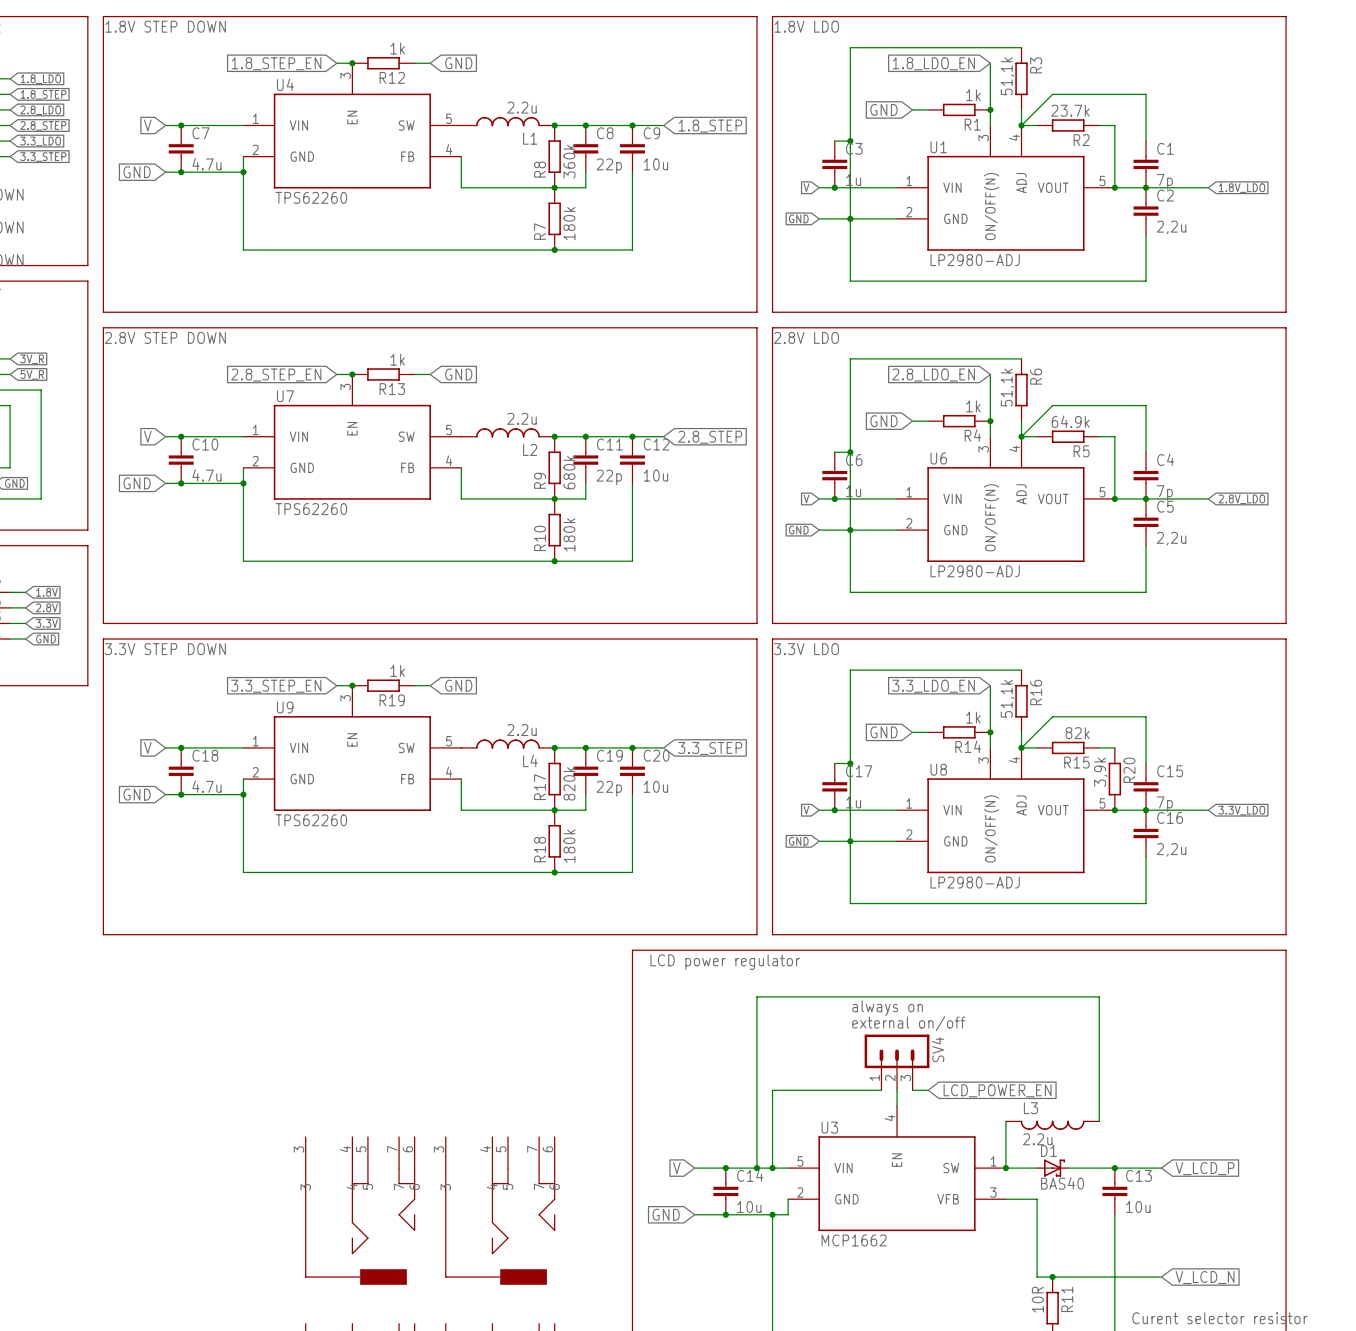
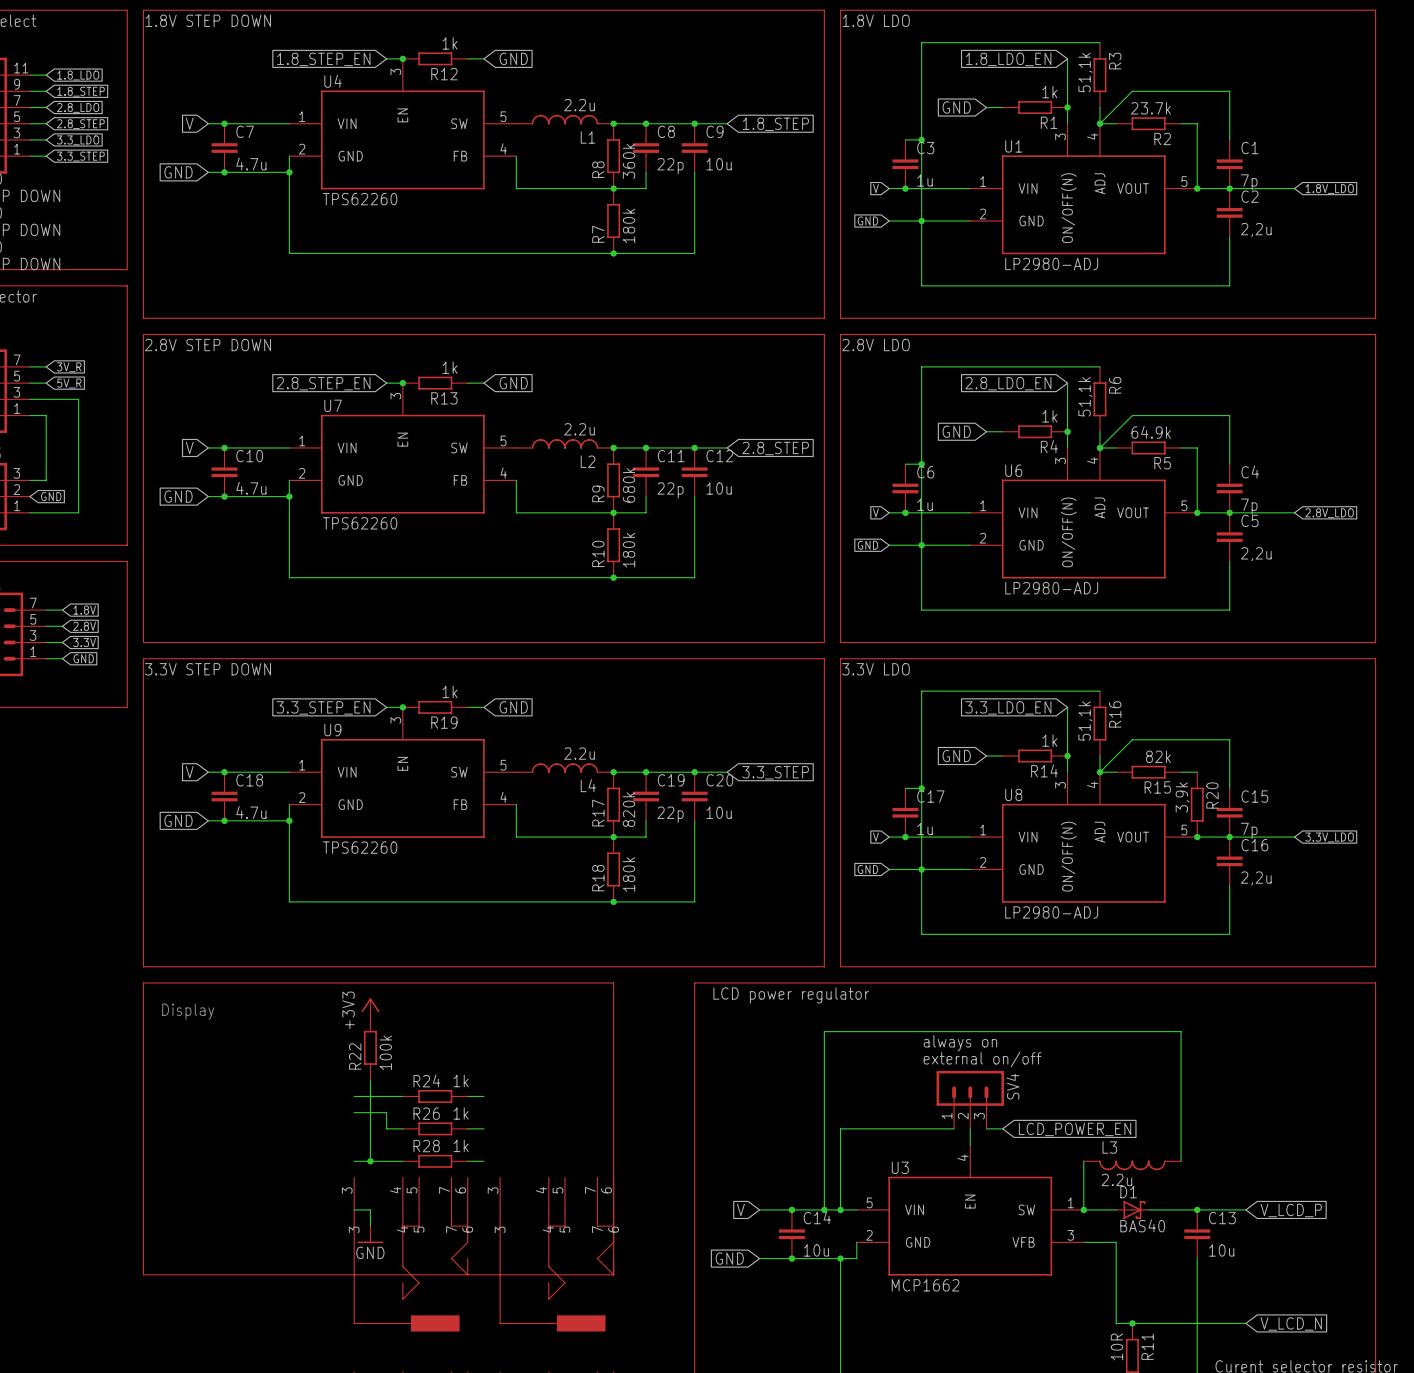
line: none -> (143, 982) (613, 982) (613, 1274) (143, 1274) (143, 982)
power symbol: none -> +3V3 (370, 1006)
text: none -> Display (188, 1011)
R22: none -> 100k (370, 1047)
wire: none -> (370, 1080) (370, 1161)
wire: none -> (354, 1096) (402, 1096)
R24: none -> 1k (435, 1096)
wire: none -> (467, 1096) (483, 1096)
wire: none -> (354, 1112) (386, 1112) (386, 1128) (402, 1128)
R26: none -> 1k (435, 1128)
wire: none -> (467, 1128) (483, 1128)
wire: none -> (354, 1161) (402, 1161)
junction: none -> (370, 1161)
R28: none -> 1k (435, 1161)
wire: none -> (467, 1161) (483, 1161)
wire: none -> (354, 1209) (370, 1209) (370, 1226)
power symbol: none -> GND (370, 1234)

